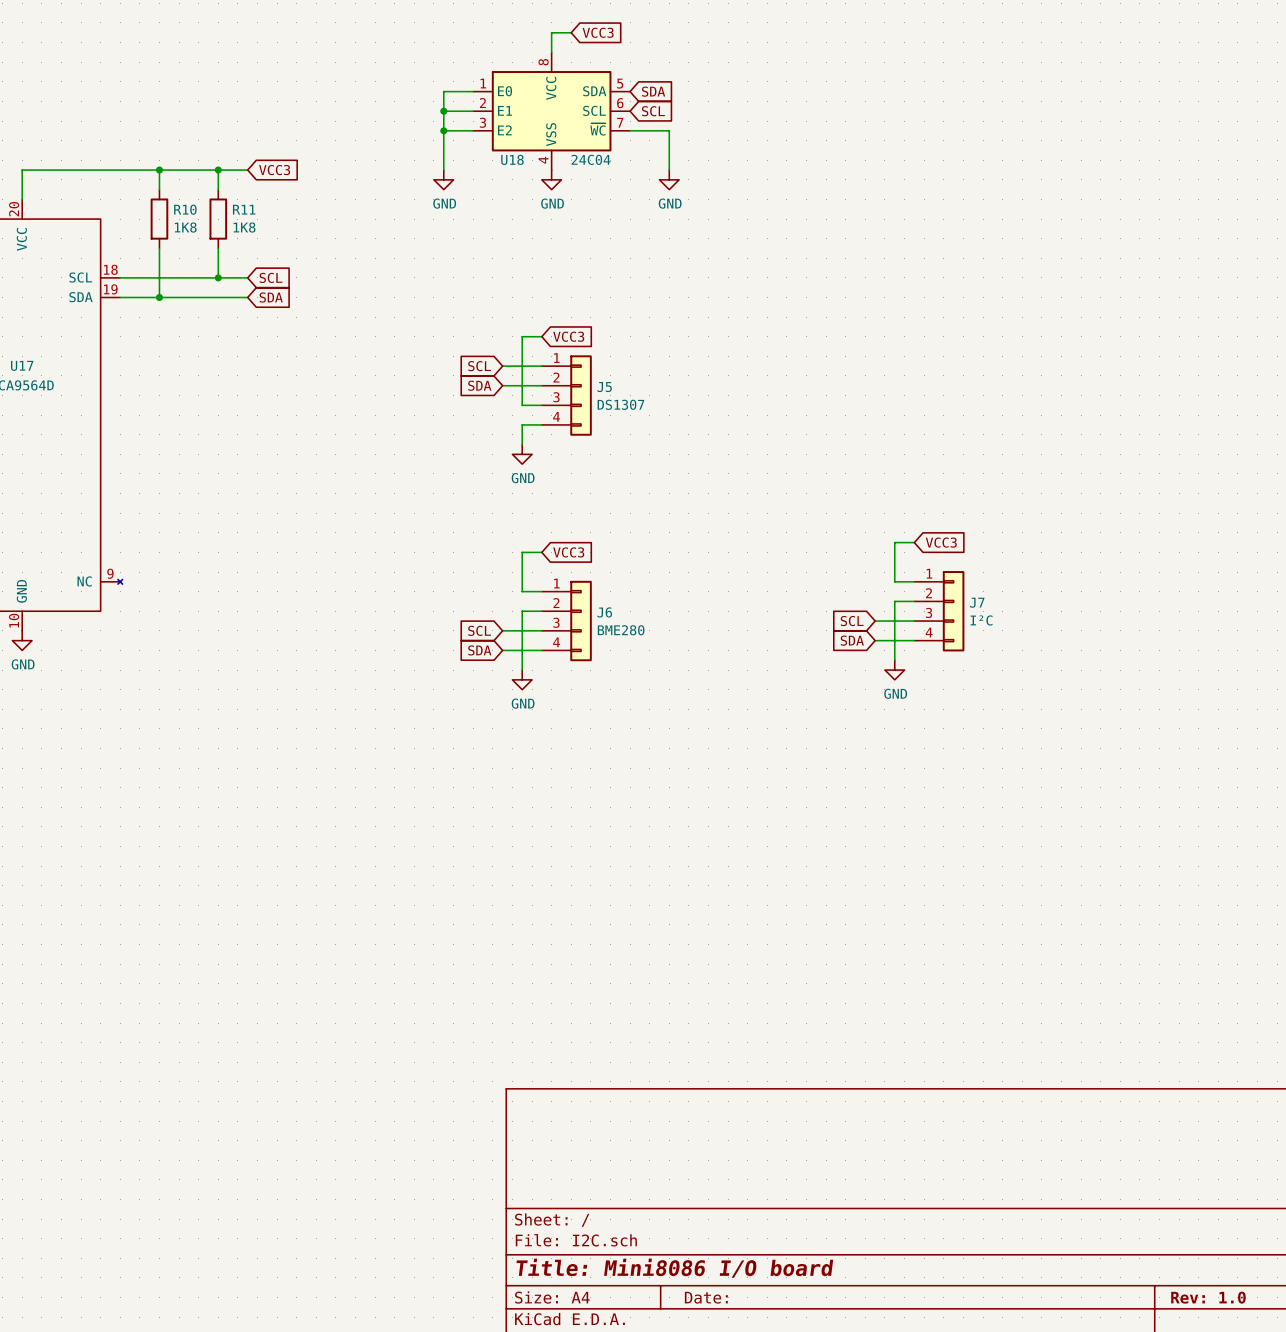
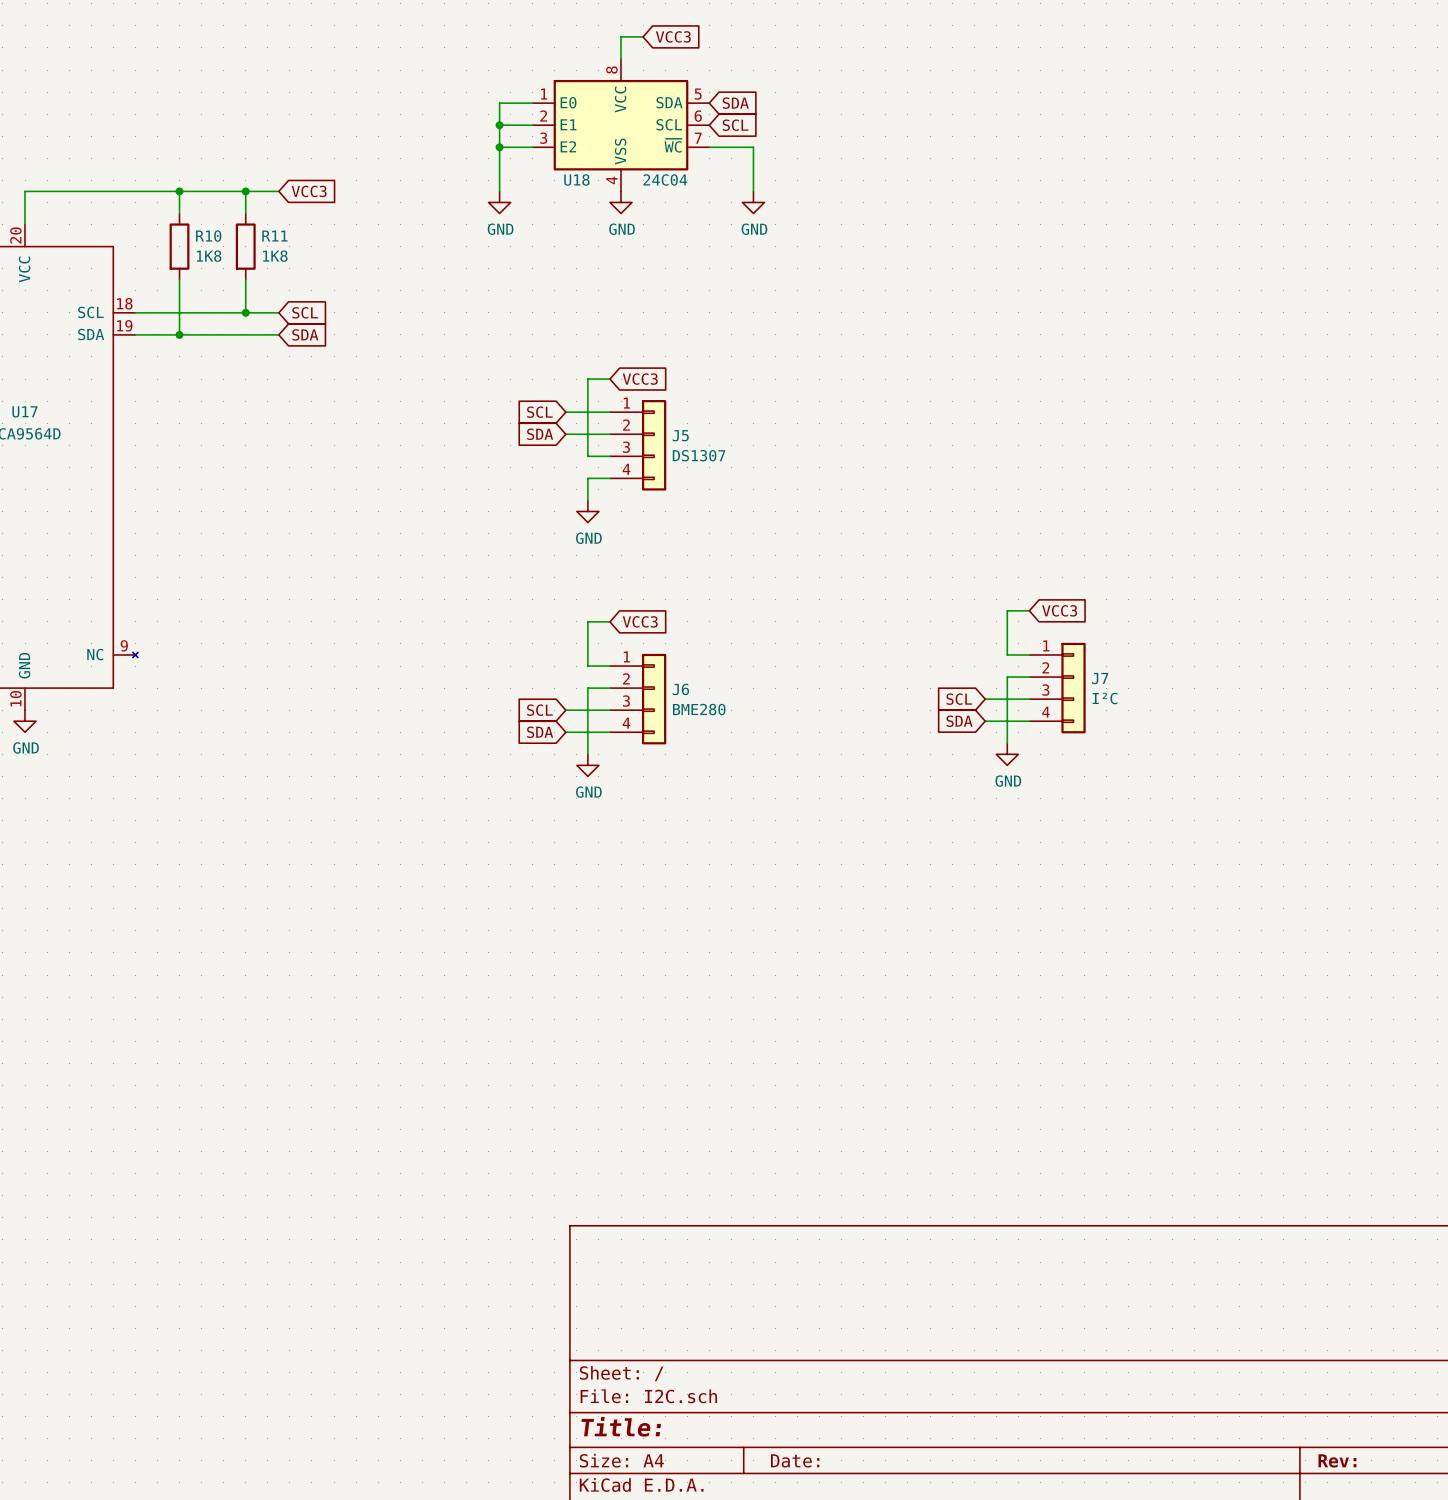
title block: Title: Mini8086 I/O board (674, 1268) -> Title: (621, 1426)
title block: Rev: 1.0 (1208, 1297) -> Rev: (1337, 1460)

